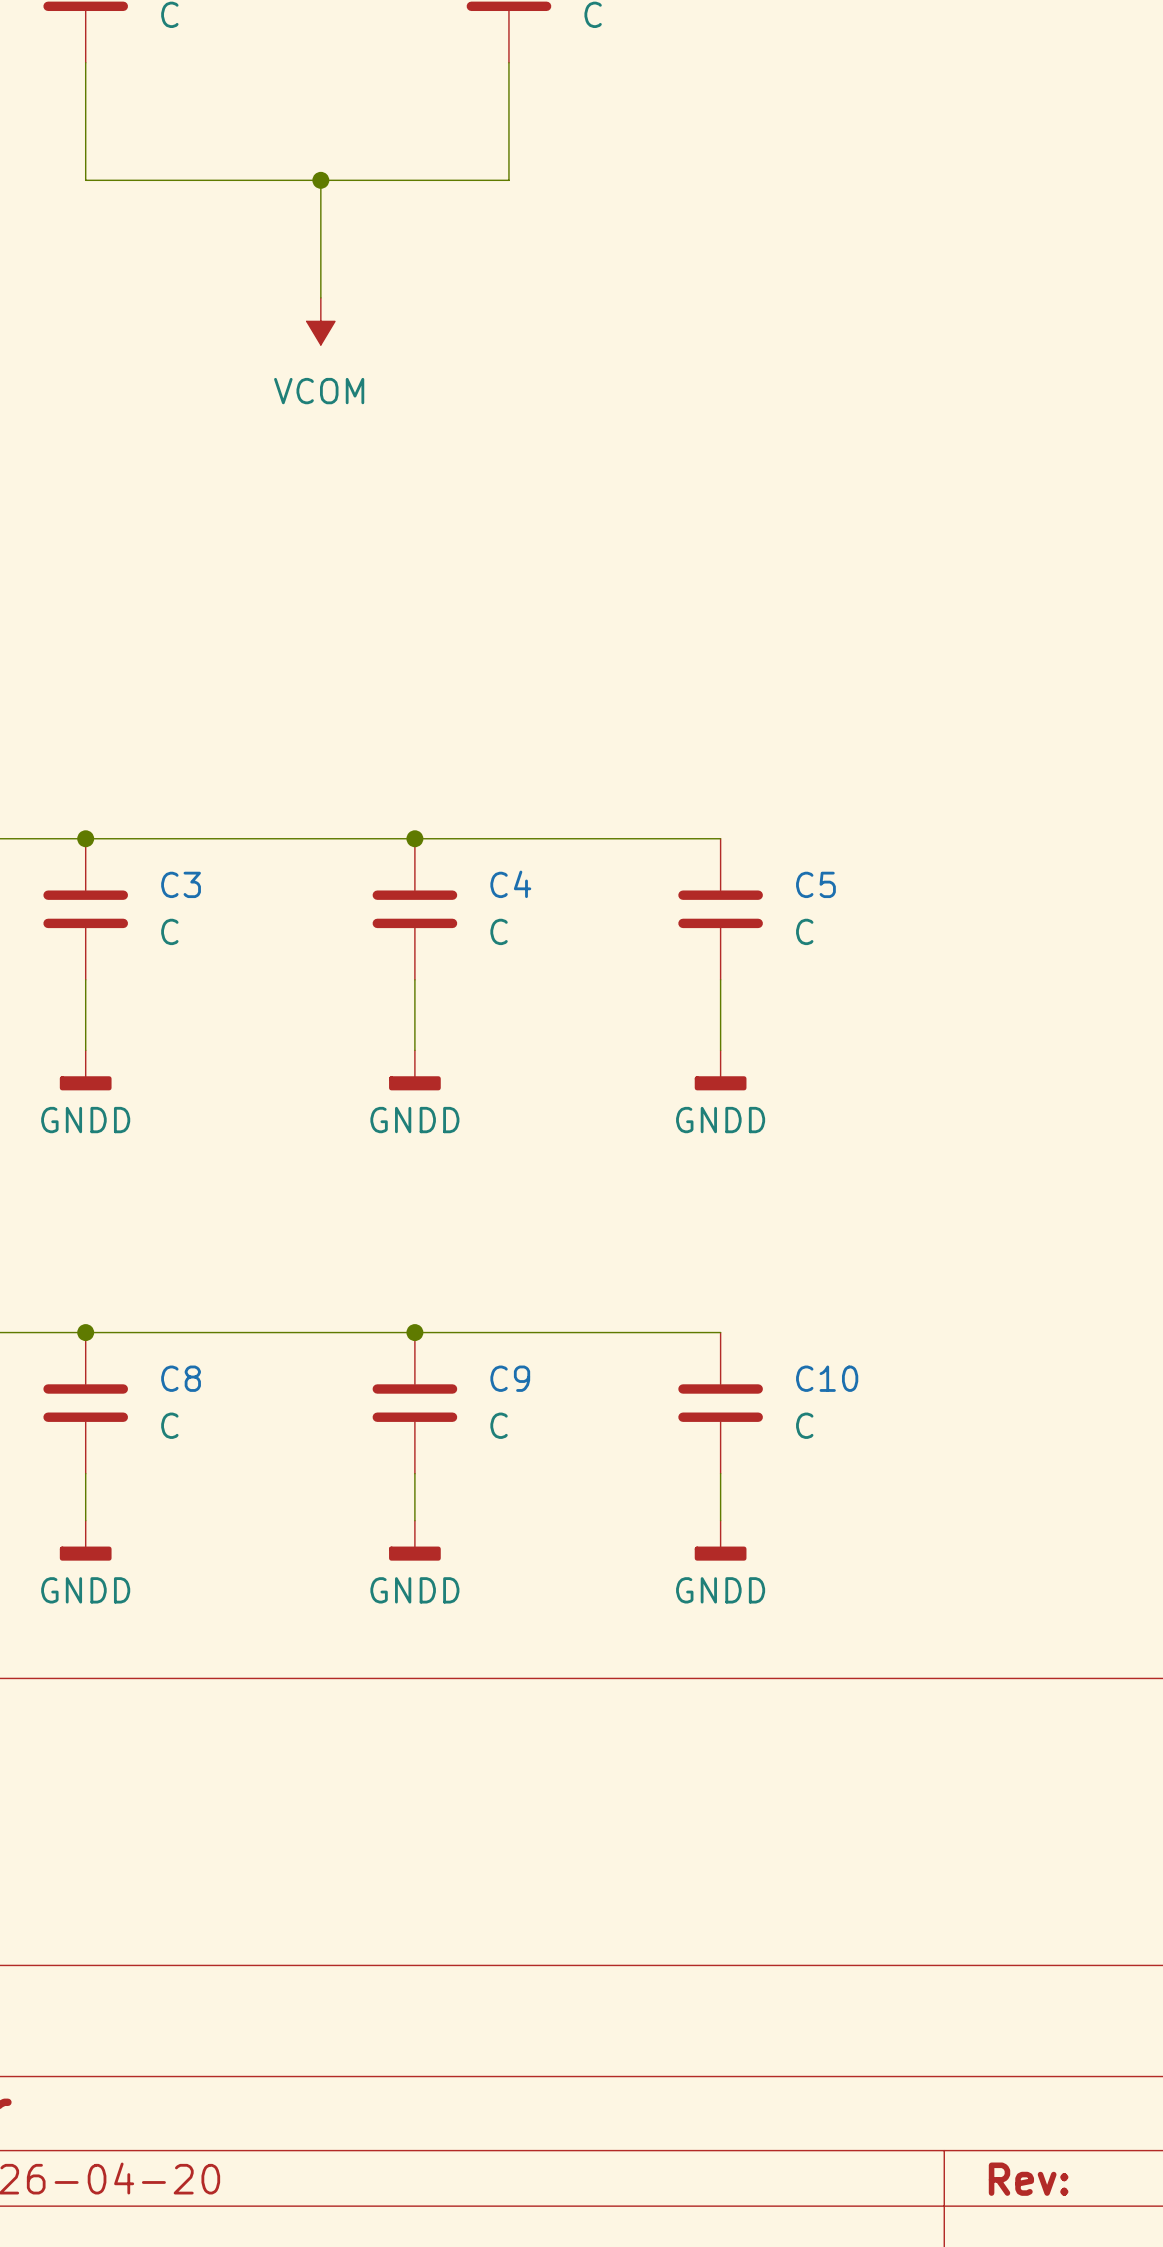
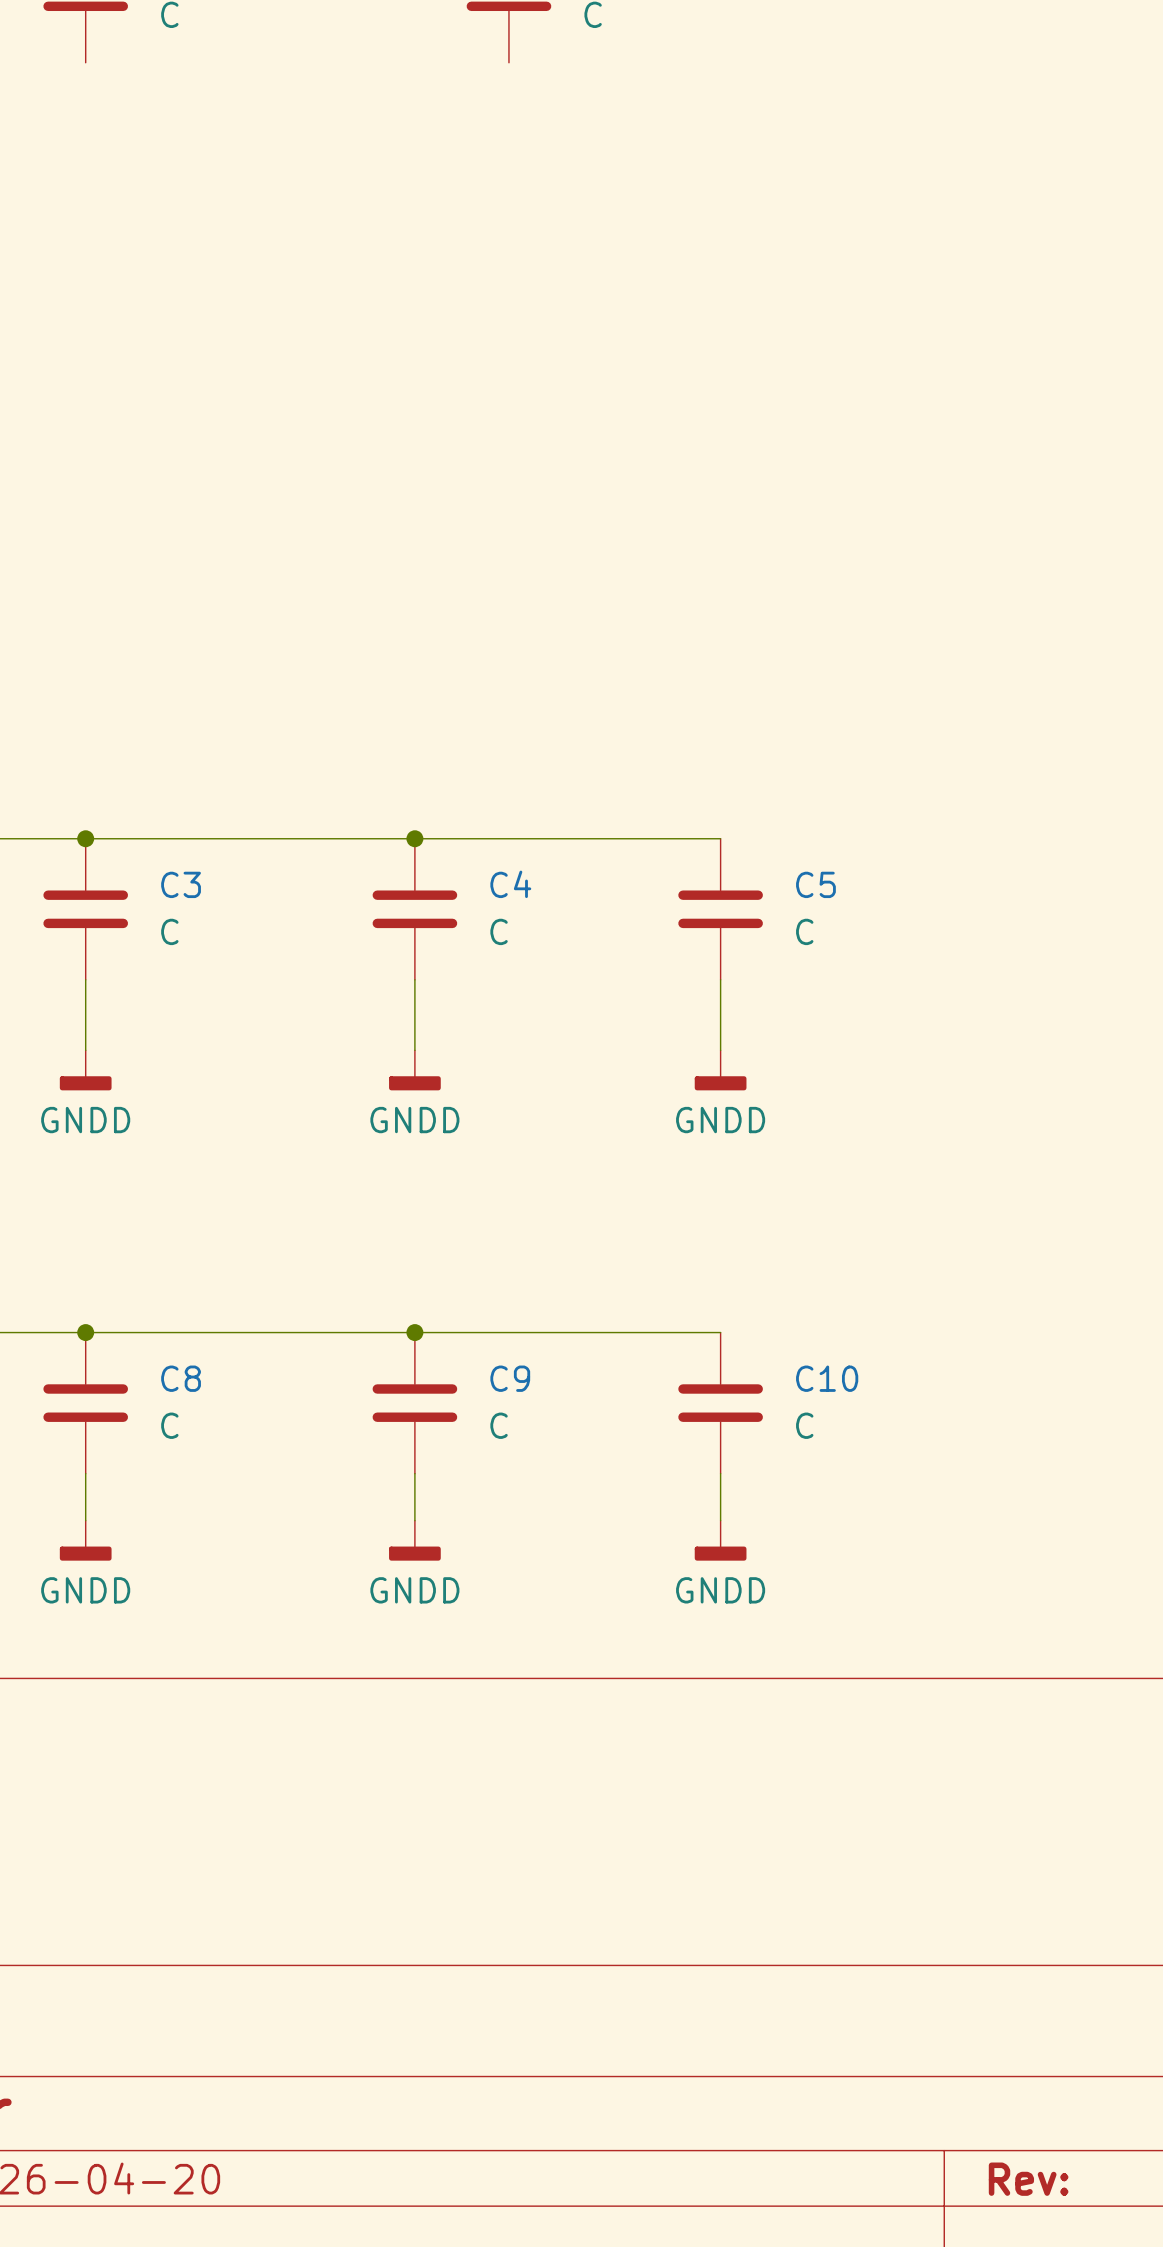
wire: (85, 62) (85, 180) (508, 180) (508, 62) -> none
wire: (320, 180) (320, 297) -> none
junction: (320, 180) -> none
power symbol: VCOM (320, 321) -> none

